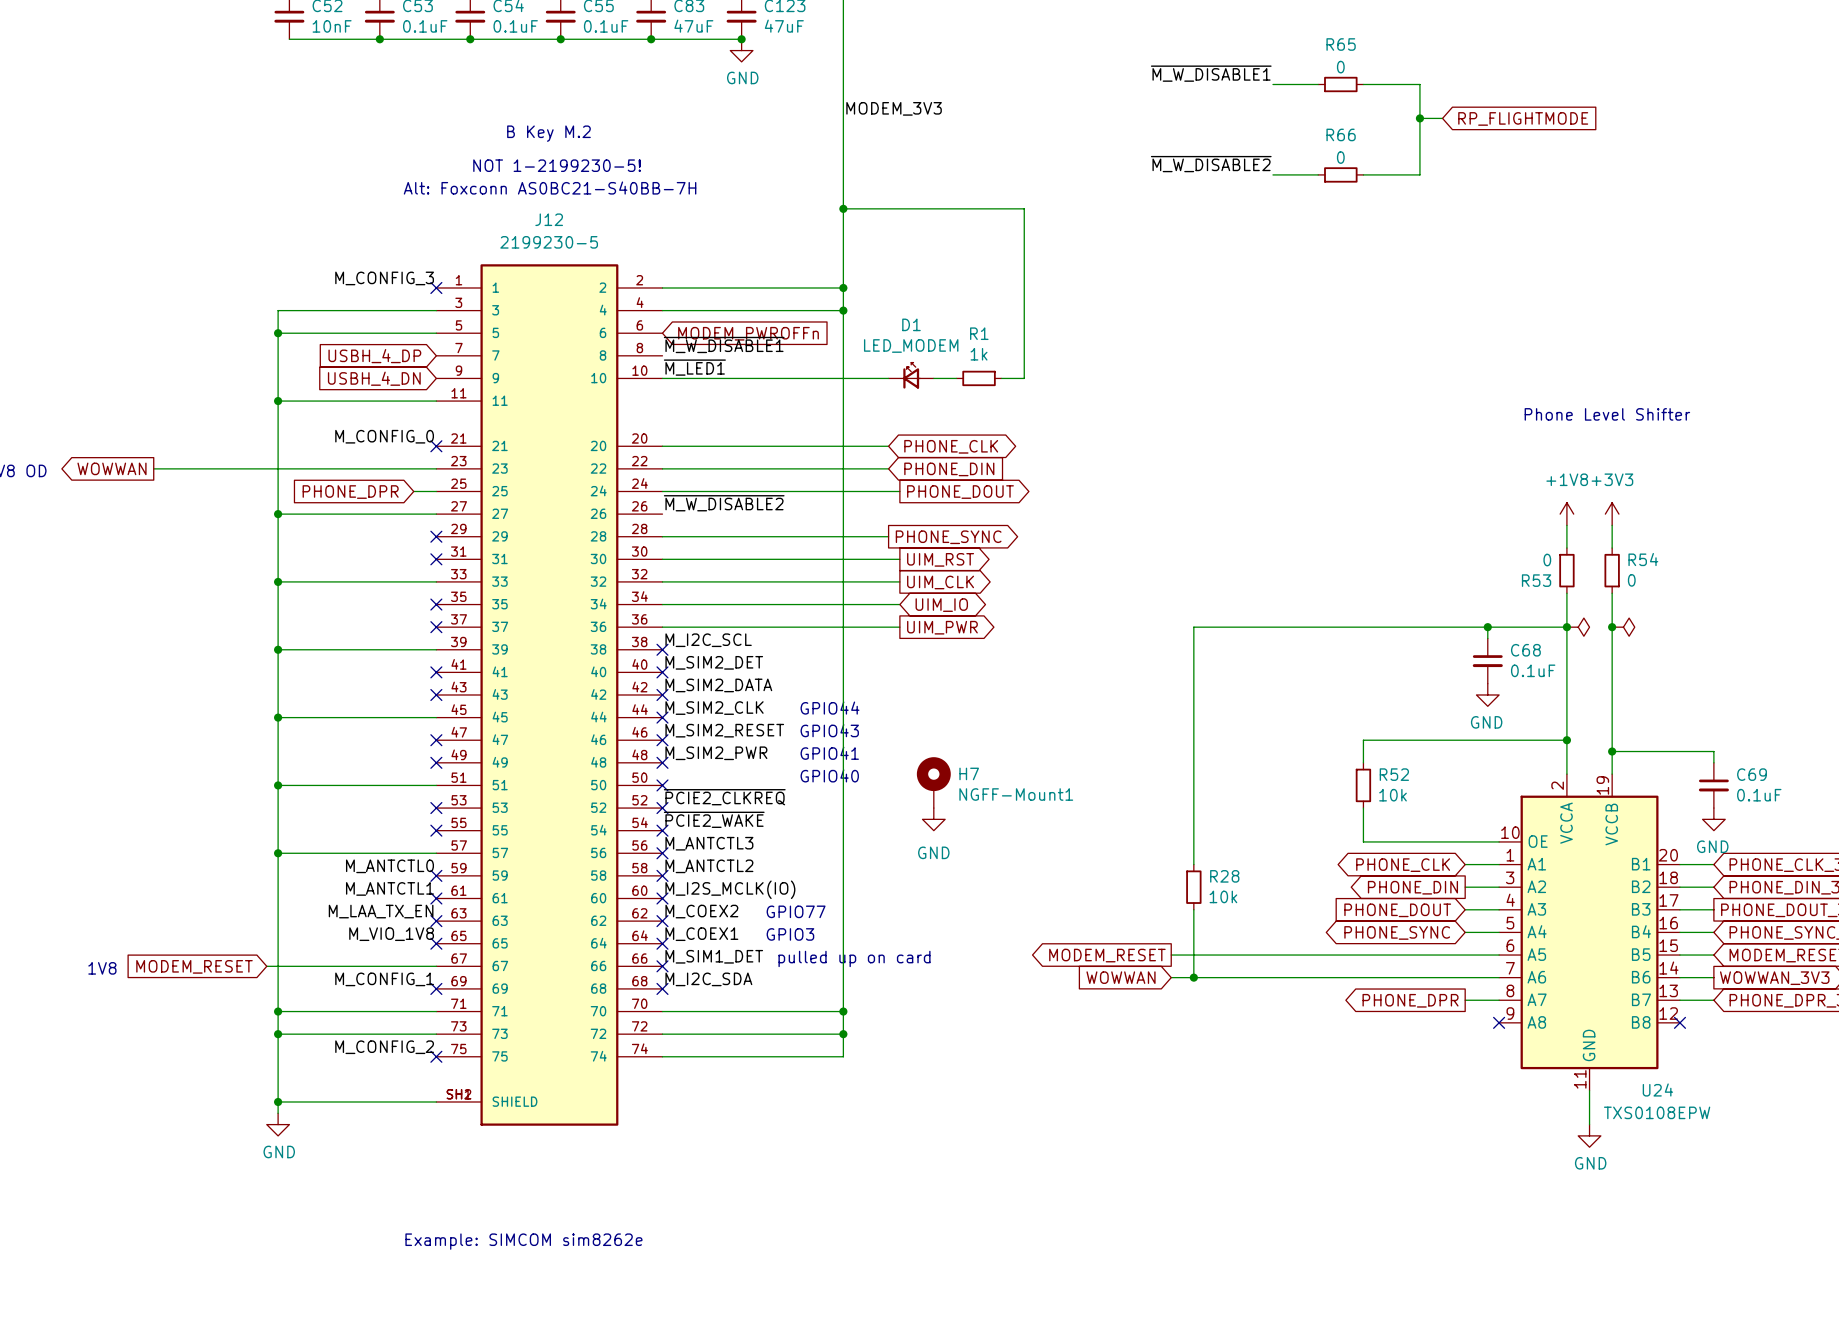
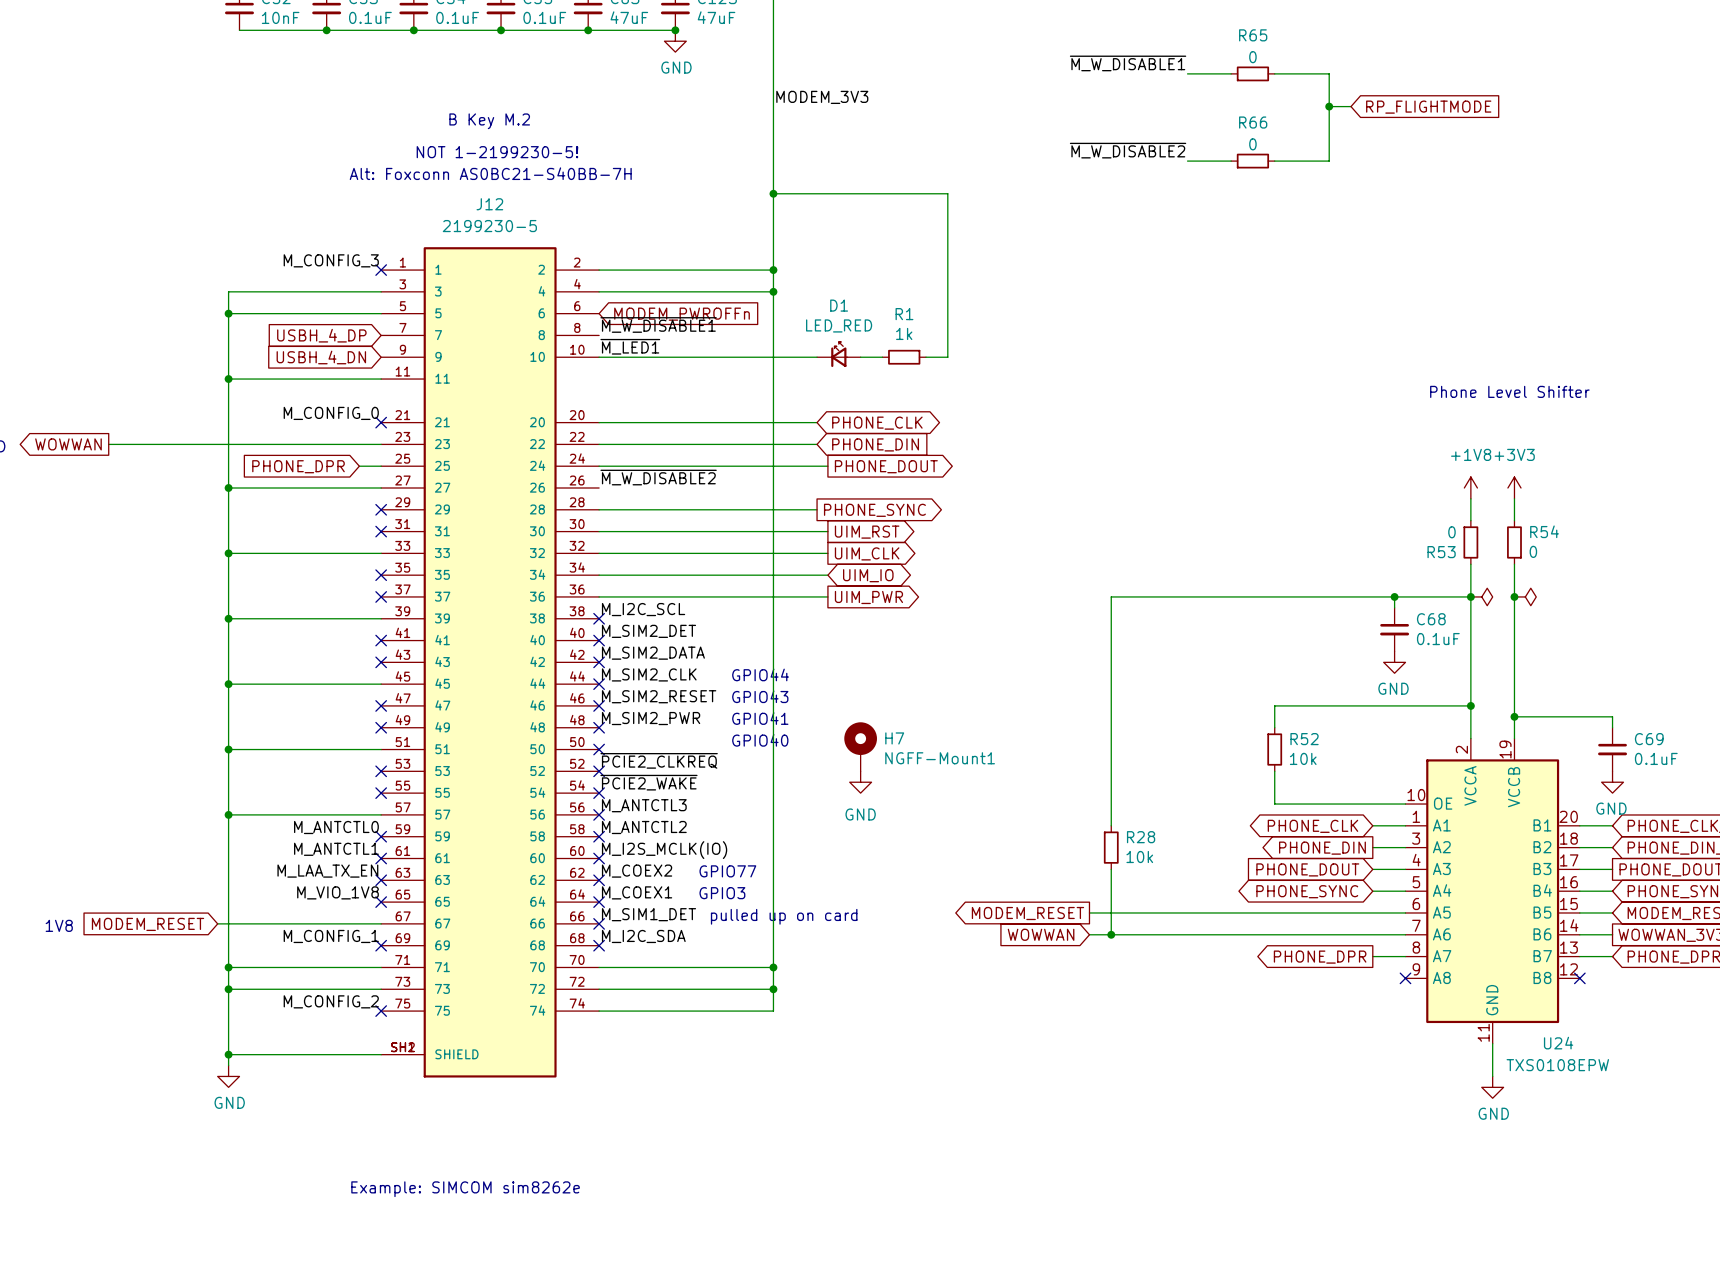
D1 value: LED_MODEM (911, 345) -> LED_RED (839, 325)

